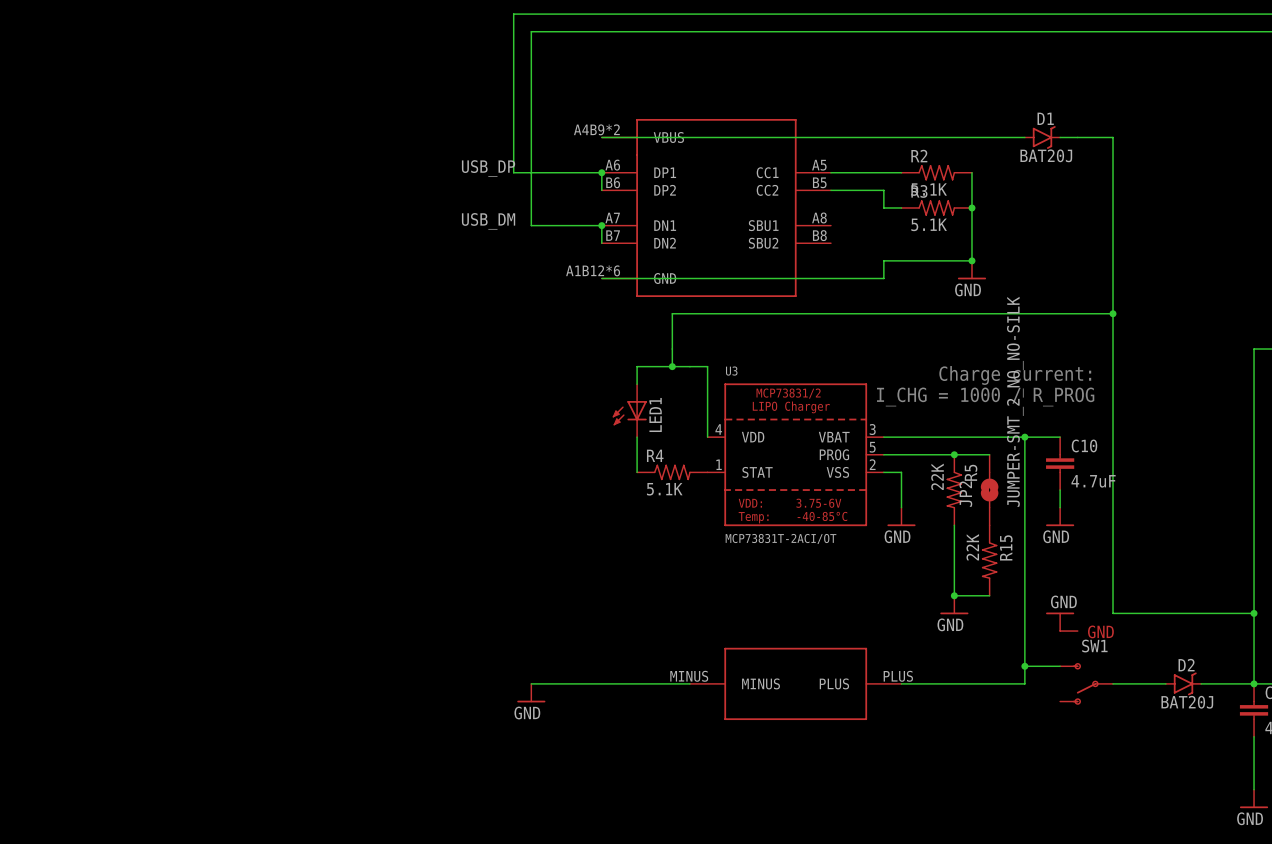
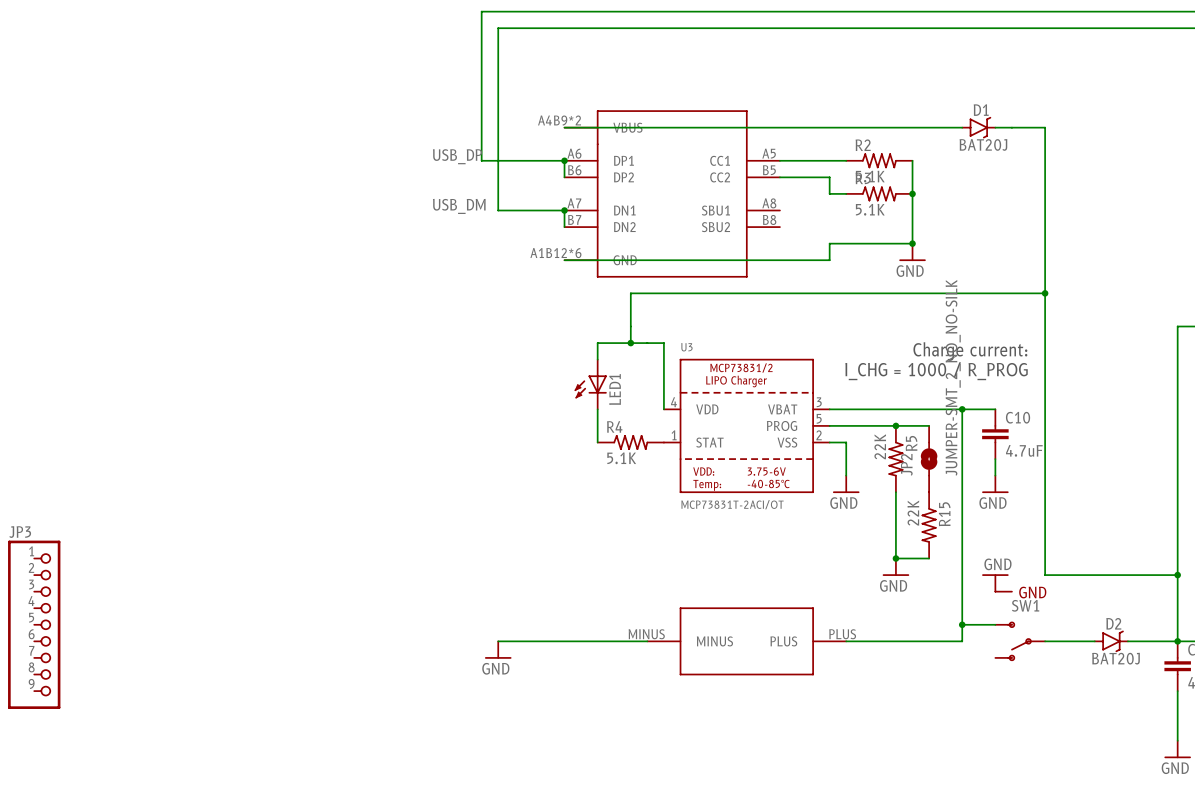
JP3: none -> (34, 624)

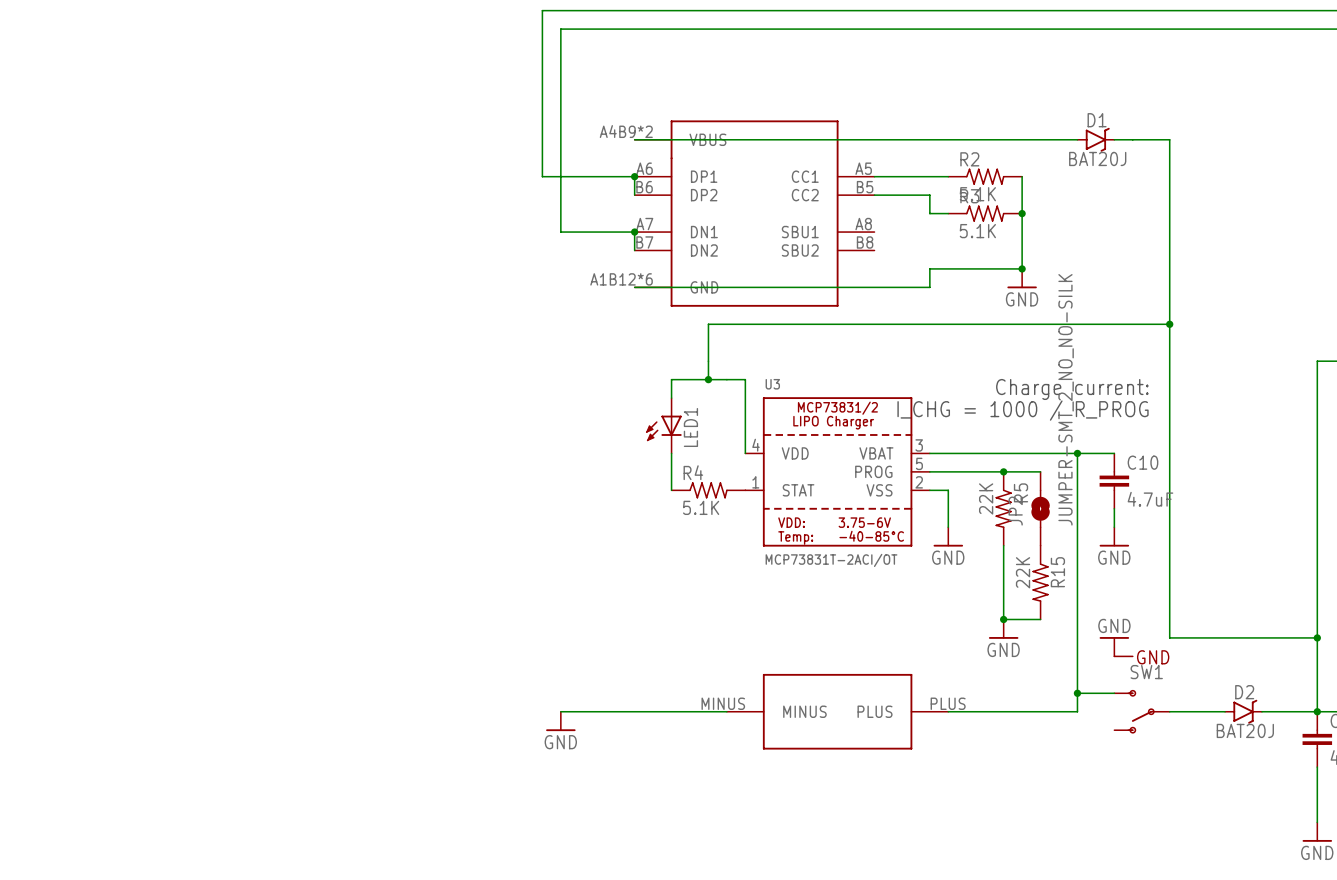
label: USB_DP (457, 156) -> none
label: USB_DM (459, 206) -> none
JP3: (34, 624) -> none

